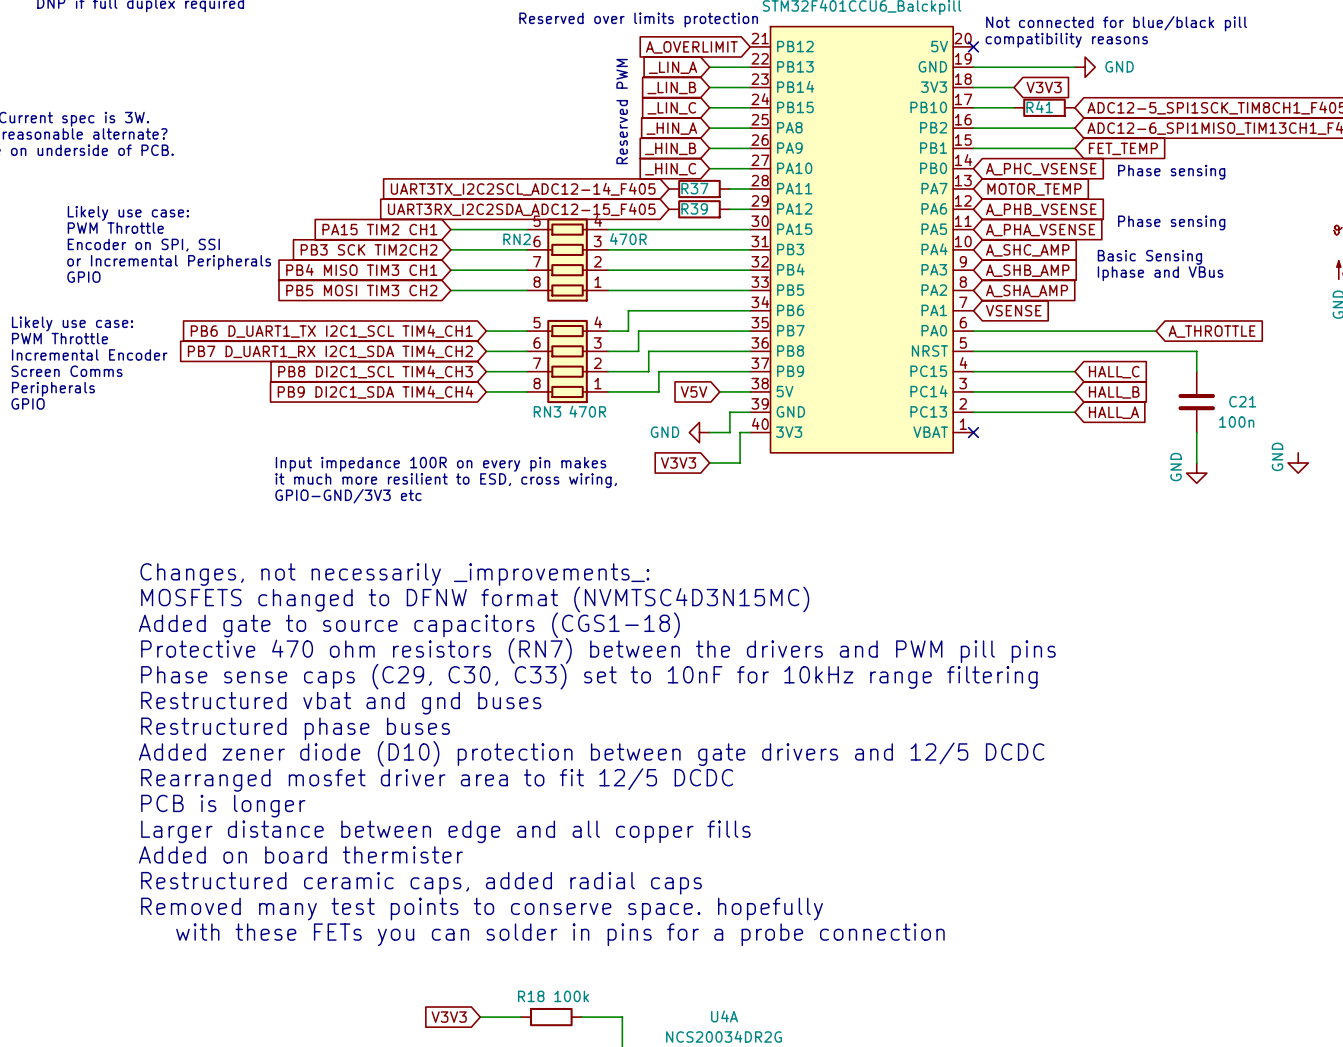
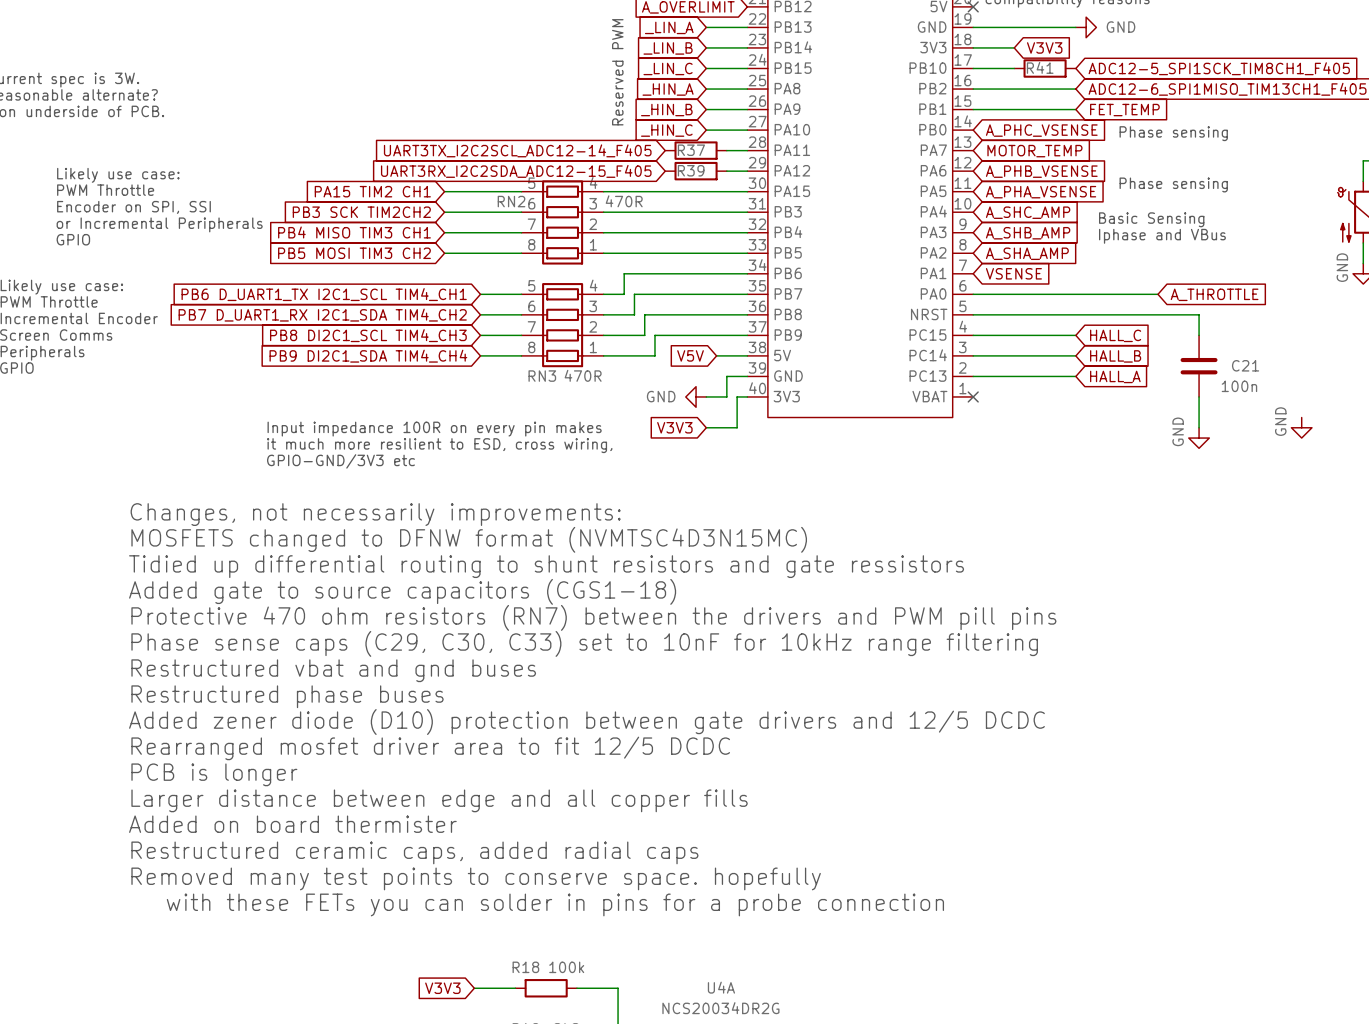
text: none -> Changes, not necessarily improvements: (375, 514)
text: Changes, not necessarily _improvements_: (394, 574) -> MOSFETS changed to DFNW format (NVMTSC4D3N15MC) (469, 539)
text: MOSFETS changed to DFNW format (NVMTSC4D3N15MC) (475, 599) -> Tidied up differential routing to shunt resistors and gate ressistors (546, 566)

